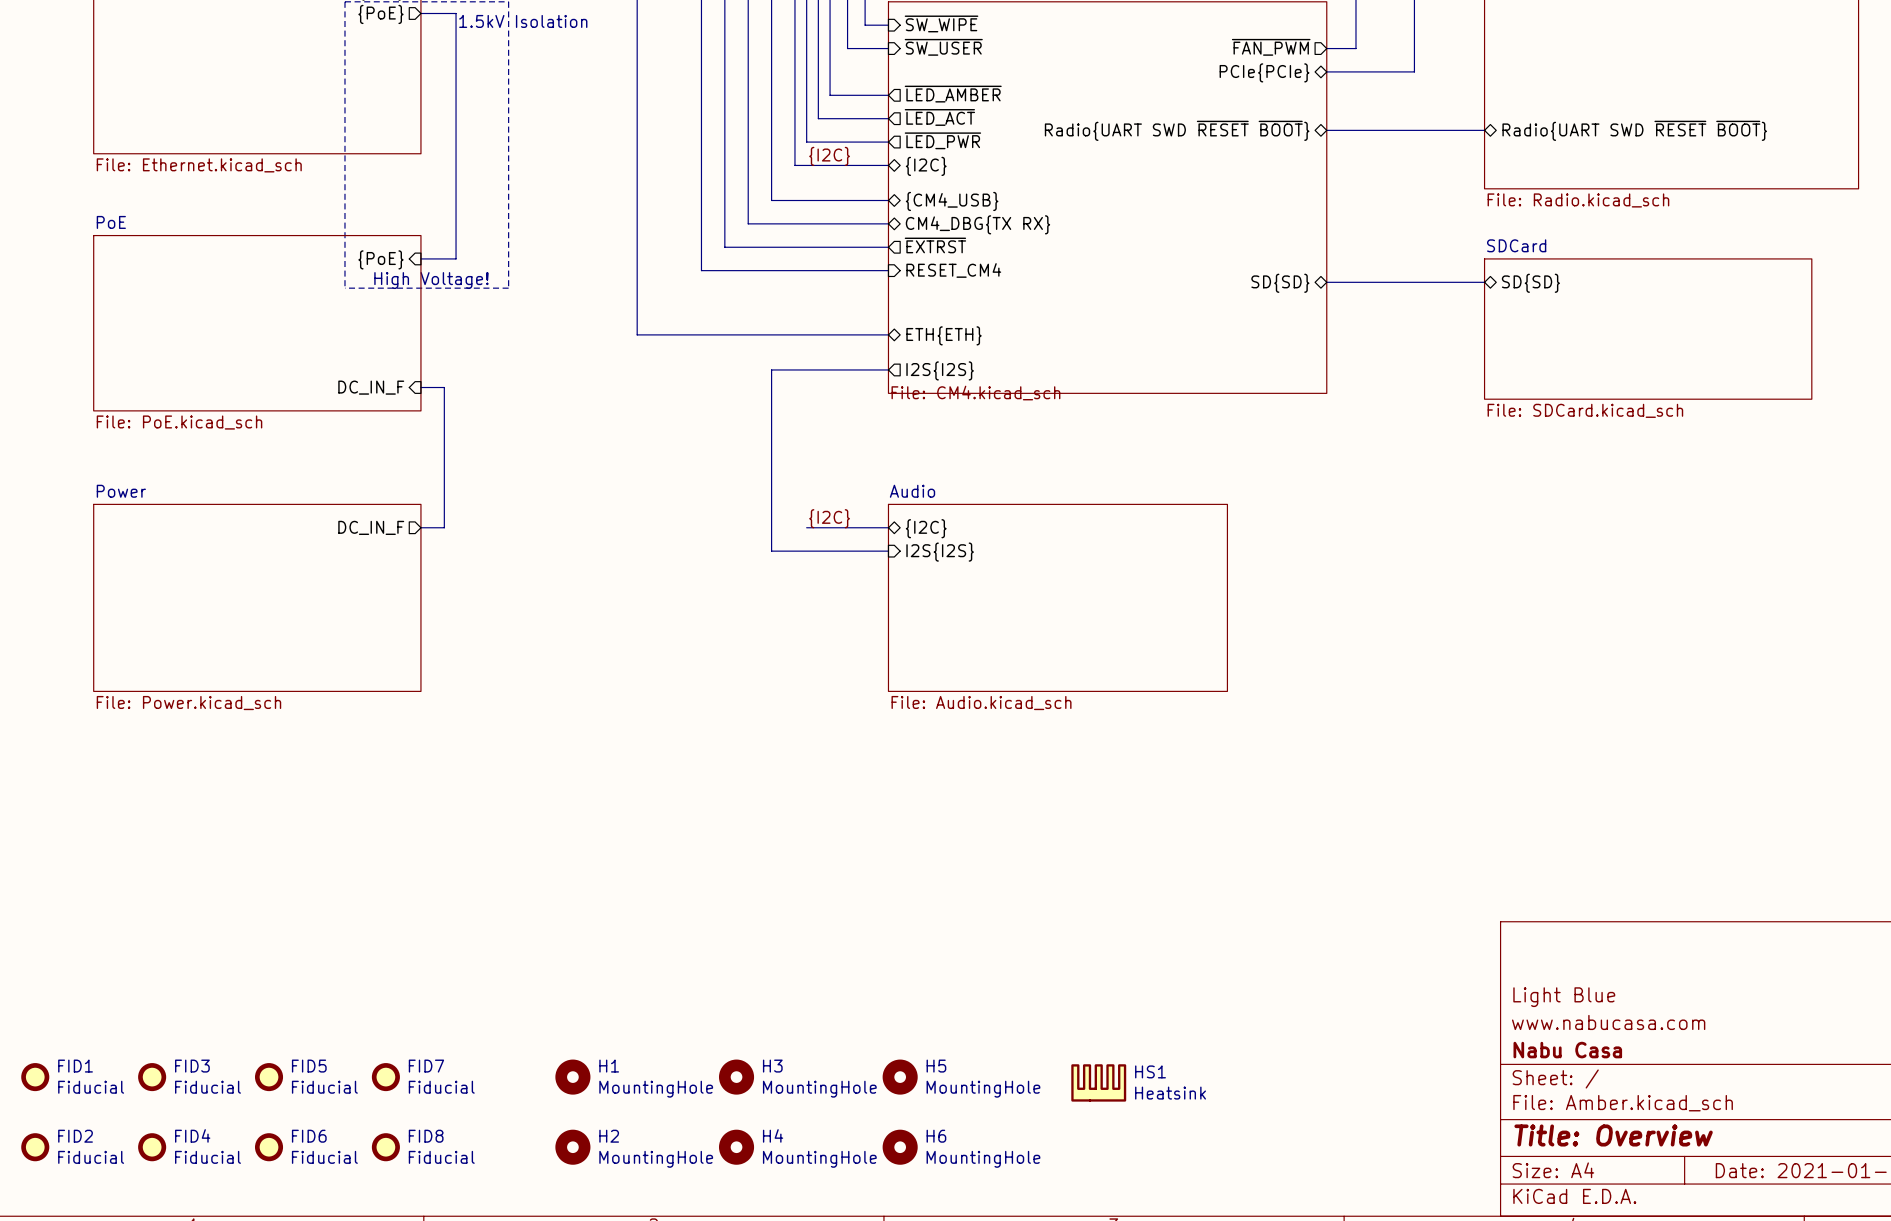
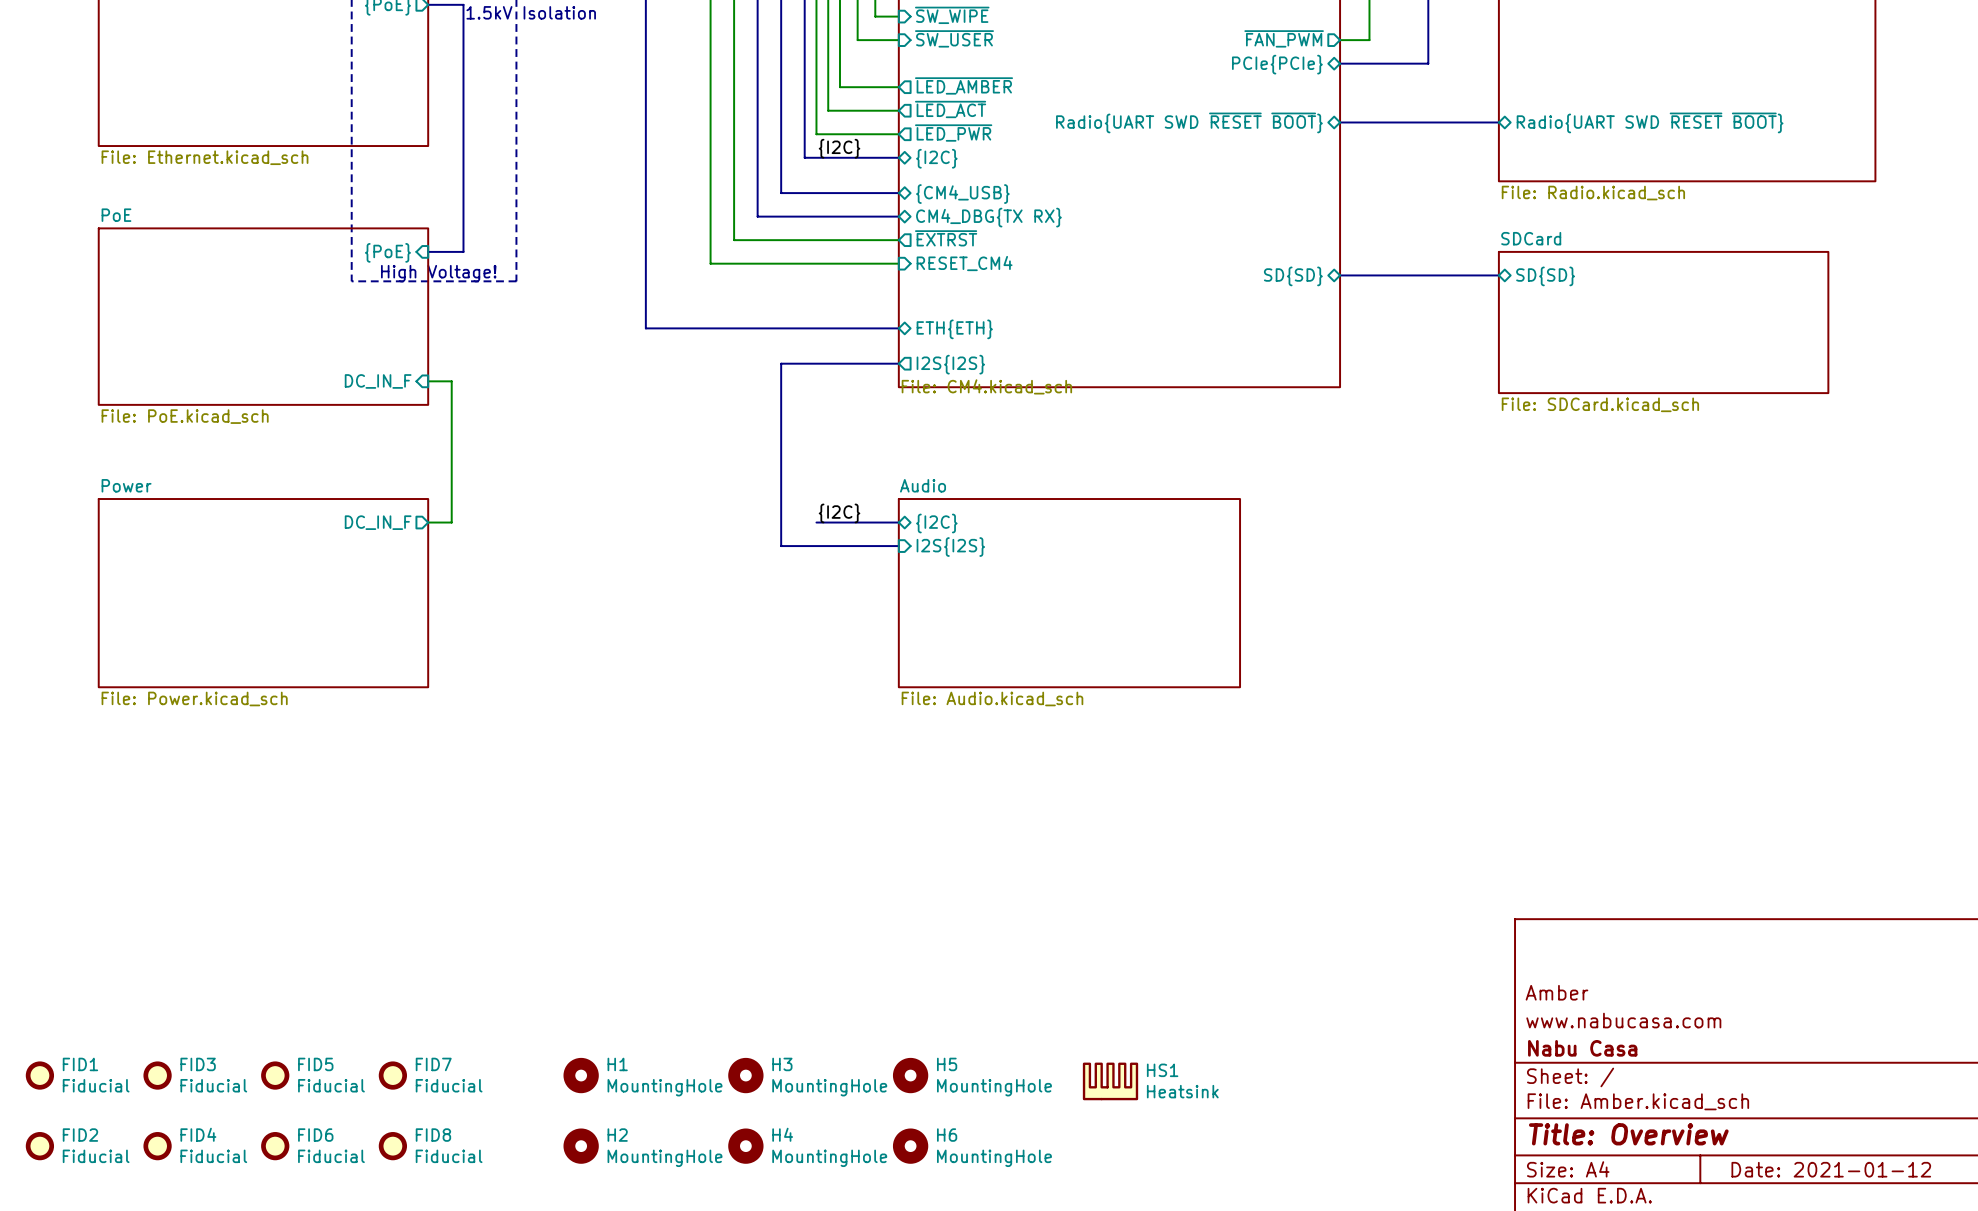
title block: Light Blue (1564, 997) -> Amber (1556, 992)

